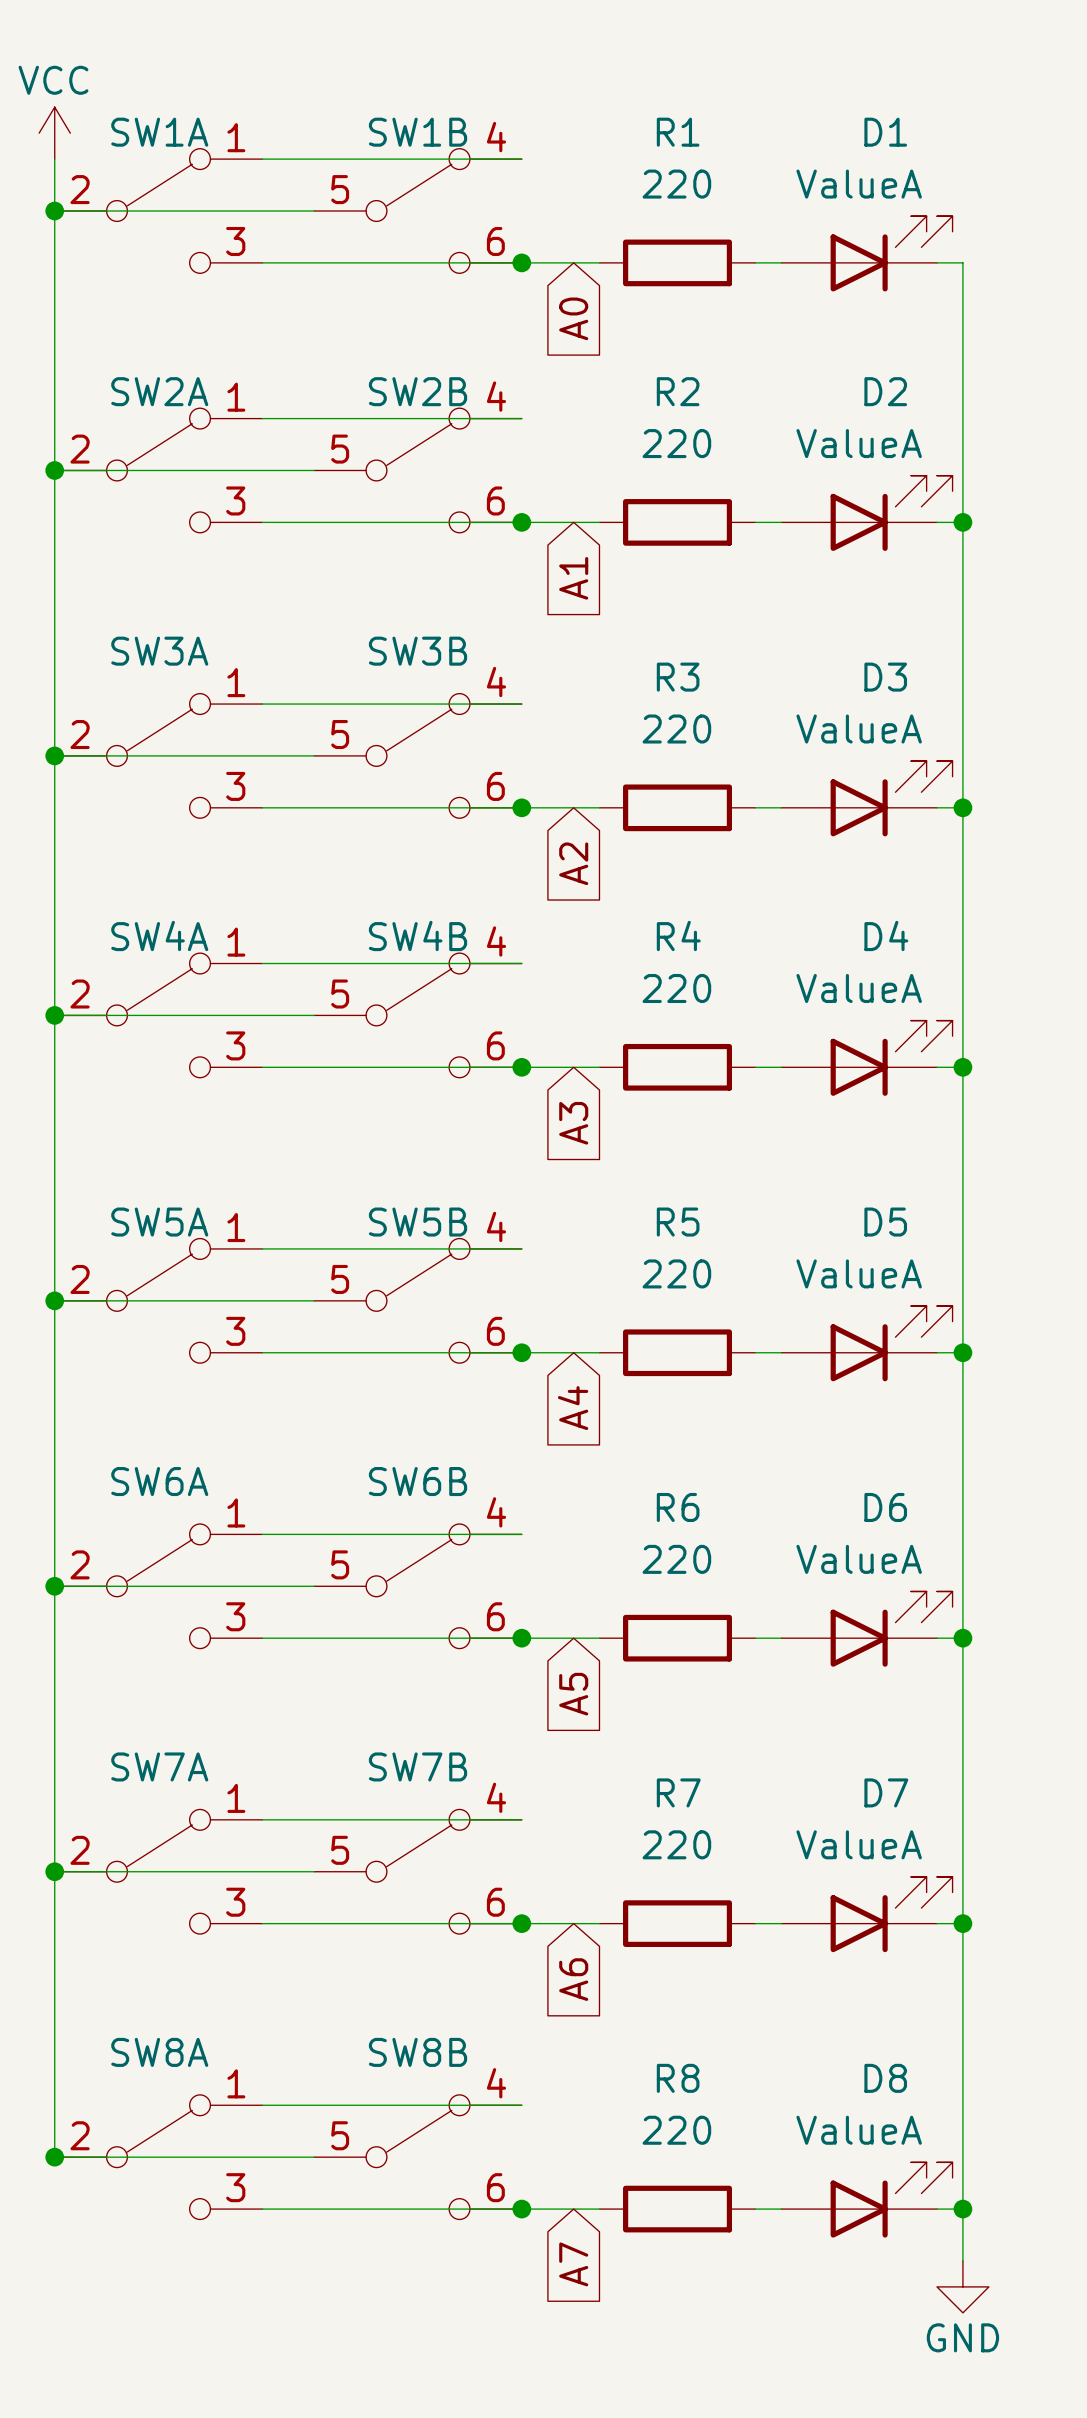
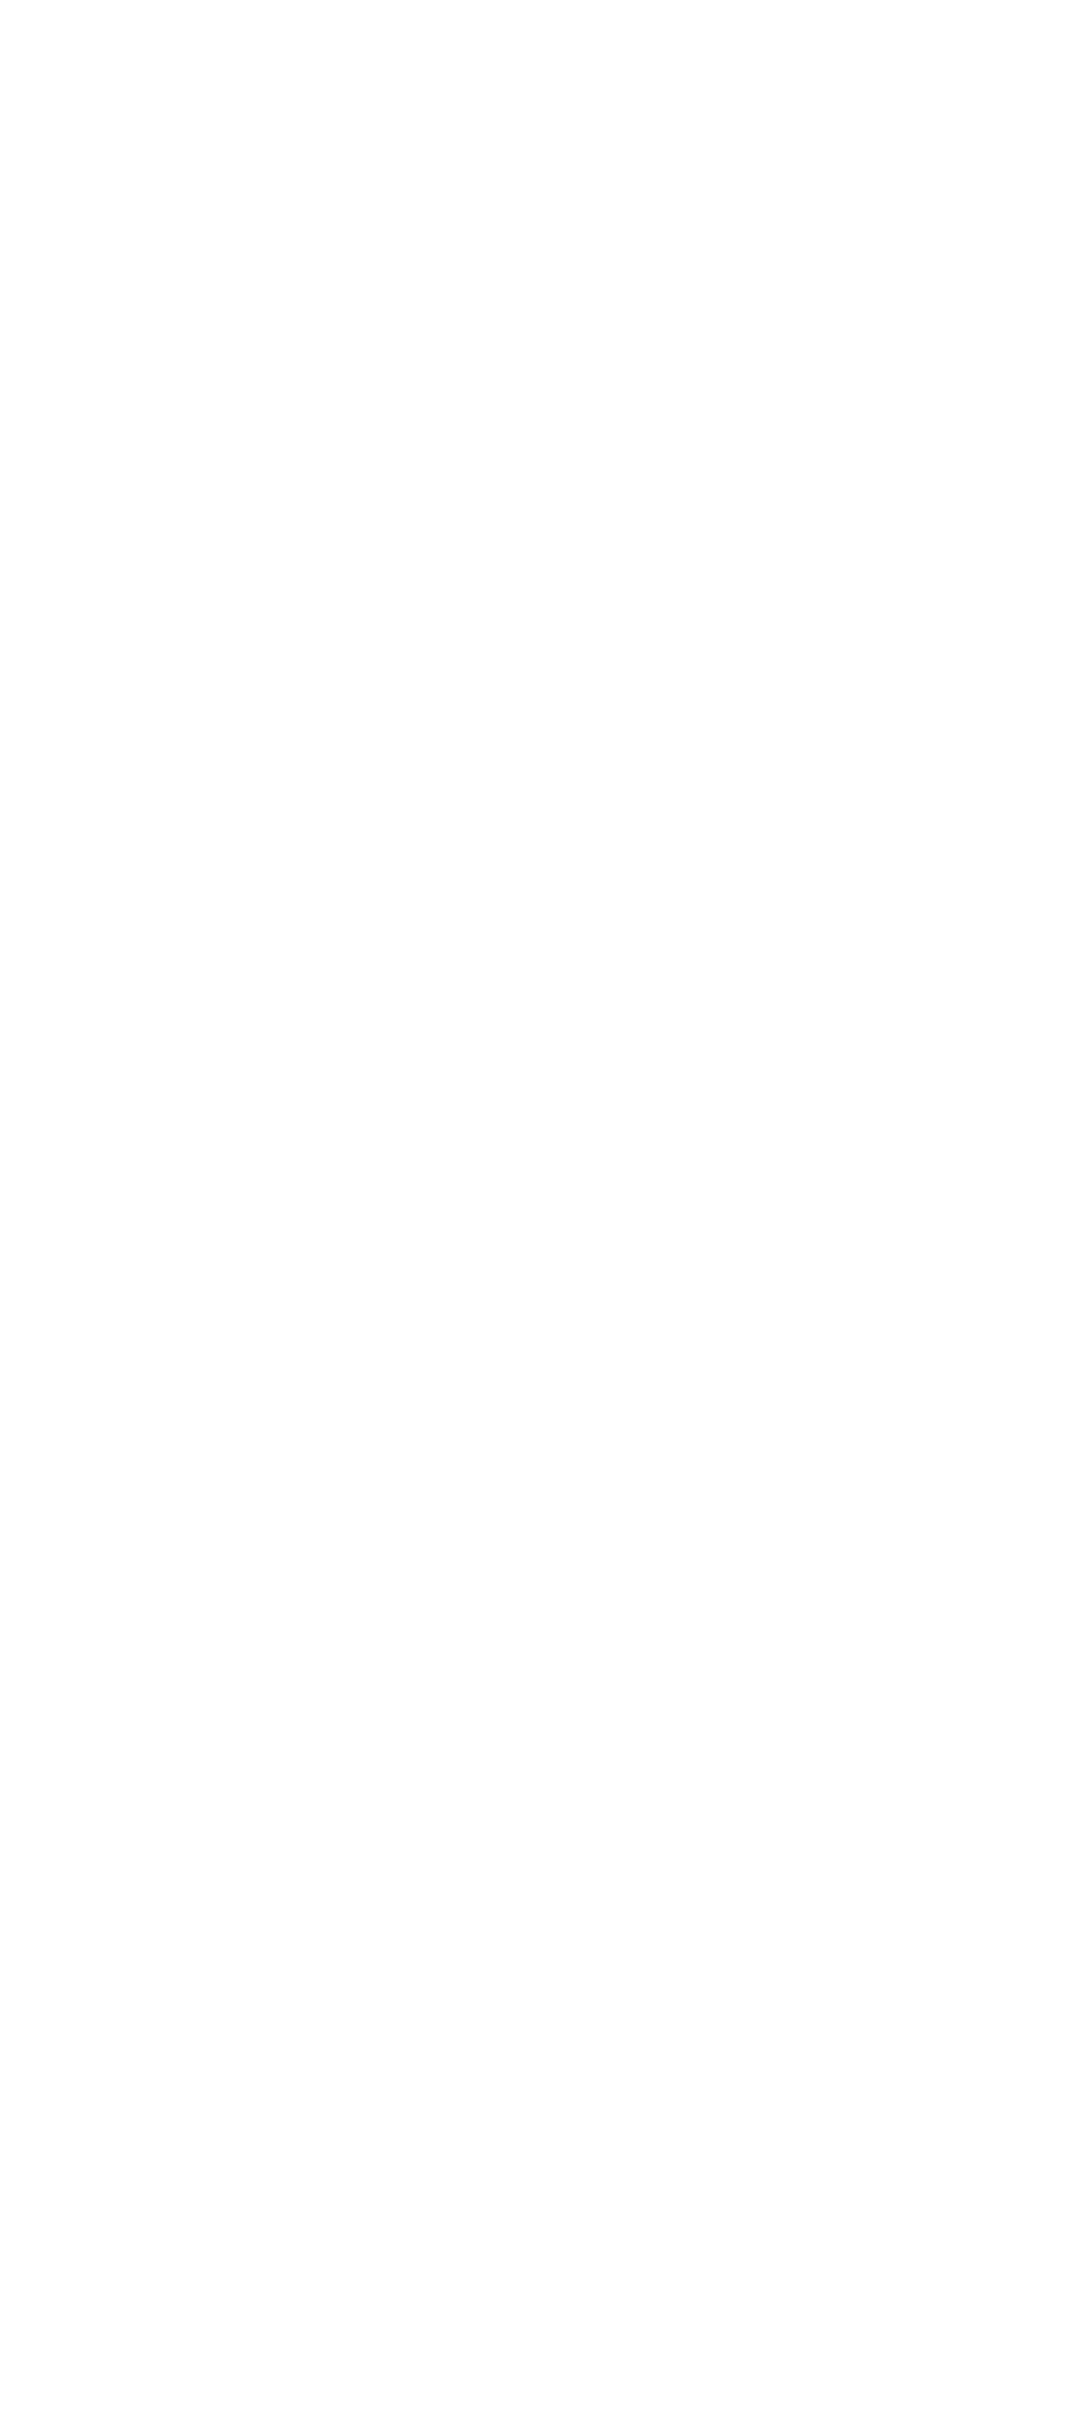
power symbol: VCC (54, 133) -> none
wire: (54, 159) (54, 2157) (314, 2157) -> none
wire: (262, 159) (521, 159) -> none
wire: (54, 211) (314, 211) -> none
junction: (54, 211) -> none
SW1A: (158, 211) -> none
SW1B: (418, 211) -> none
D1: ValueA (866, 253) -> none
wire: (262, 262) (599, 262) -> none
junction: (521, 262) -> none
R1: 220 (677, 262) -> none
wire: (755, 262) (781, 262) -> none
wire: (936, 262) (962, 262) (962, 2260) -> none
global label: A0 (573, 318) -> none
wire: (262, 418) (521, 418) -> none
wire: (54, 470) (314, 470) -> none
junction: (54, 470) -> none
SW2A: (158, 470) -> none
SW2B: (418, 470) -> none
D2: ValueA (866, 513) -> none
wire: (262, 522) (599, 522) -> none
junction: (521, 522) -> none
R2: 220 (677, 522) -> none
wire: (755, 522) (781, 522) -> none
wire: (936, 522) (962, 522) -> none
junction: (962, 522) -> none
global label: A1 (573, 578) -> none
wire: (262, 704) (521, 704) -> none
wire: (54, 755) (314, 755) -> none
junction: (54, 755) -> none
SW3A: (158, 755) -> none
SW3B: (418, 755) -> none
D3: ValueA (866, 798) -> none
wire: (262, 807) (599, 807) -> none
junction: (521, 807) -> none
R3: 220 (677, 807) -> none
wire: (755, 807) (781, 807) -> none
wire: (936, 807) (962, 807) -> none
junction: (962, 807) -> none
global label: A2 (573, 863) -> none
wire: (262, 963) (521, 963) -> none
wire: (54, 1015) (314, 1015) -> none
junction: (54, 1015) -> none
SW4A: (158, 1015) -> none
SW4B: (418, 1015) -> none
D4: ValueA (866, 1058) -> none
wire: (262, 1067) (599, 1067) -> none
junction: (521, 1067) -> none
R4: 220 (677, 1067) -> none
wire: (755, 1067) (781, 1067) -> none
wire: (936, 1067) (962, 1067) -> none
junction: (962, 1067) -> none
global label: A3 (573, 1123) -> none
wire: (262, 1248) (521, 1248) -> none
wire: (54, 1300) (314, 1300) -> none
junction: (54, 1300) -> none
SW5A: (158, 1300) -> none
SW5B: (418, 1300) -> none
D5: ValueA (866, 1343) -> none
wire: (262, 1352) (599, 1352) -> none
junction: (521, 1352) -> none
R5: 220 (677, 1352) -> none
wire: (755, 1352) (781, 1352) -> none
wire: (936, 1352) (962, 1352) -> none
junction: (962, 1352) -> none
global label: A4 (573, 1408) -> none
wire: (262, 1534) (521, 1534) -> none
wire: (54, 1586) (314, 1586) -> none
junction: (54, 1586) -> none
SW6A: (158, 1586) -> none
SW6B: (418, 1586) -> none
D6: ValueA (866, 1629) -> none
wire: (262, 1638) (599, 1638) -> none
junction: (521, 1638) -> none
R6: 220 (677, 1638) -> none
wire: (755, 1638) (781, 1638) -> none
wire: (936, 1638) (962, 1638) -> none
junction: (962, 1638) -> none
global label: A5 (573, 1694) -> none
wire: (262, 1819) (521, 1819) -> none
wire: (54, 1871) (314, 1871) -> none
junction: (54, 1871) -> none
SW7A: (158, 1871) -> none
SW7B: (418, 1871) -> none
D7: ValueA (866, 1914) -> none
wire: (262, 1923) (599, 1923) -> none
junction: (521, 1923) -> none
R7: 220 (677, 1923) -> none
wire: (755, 1923) (781, 1923) -> none
wire: (936, 1923) (962, 1923) -> none
junction: (962, 1923) -> none
global label: A6 (573, 1979) -> none
wire: (262, 2105) (521, 2105) -> none
junction: (54, 2157) -> none
SW8A: (158, 2157) -> none
SW8B: (418, 2157) -> none
D8: ValueA (866, 2199) -> none
wire: (262, 2209) (599, 2209) -> none
junction: (521, 2209) -> none
R8: 220 (677, 2209) -> none
wire: (755, 2209) (781, 2209) -> none
wire: (936, 2209) (962, 2209) -> none
junction: (962, 2209) -> none
global label: A7 (573, 2264) -> none
power symbol: GND (962, 2286) -> none

